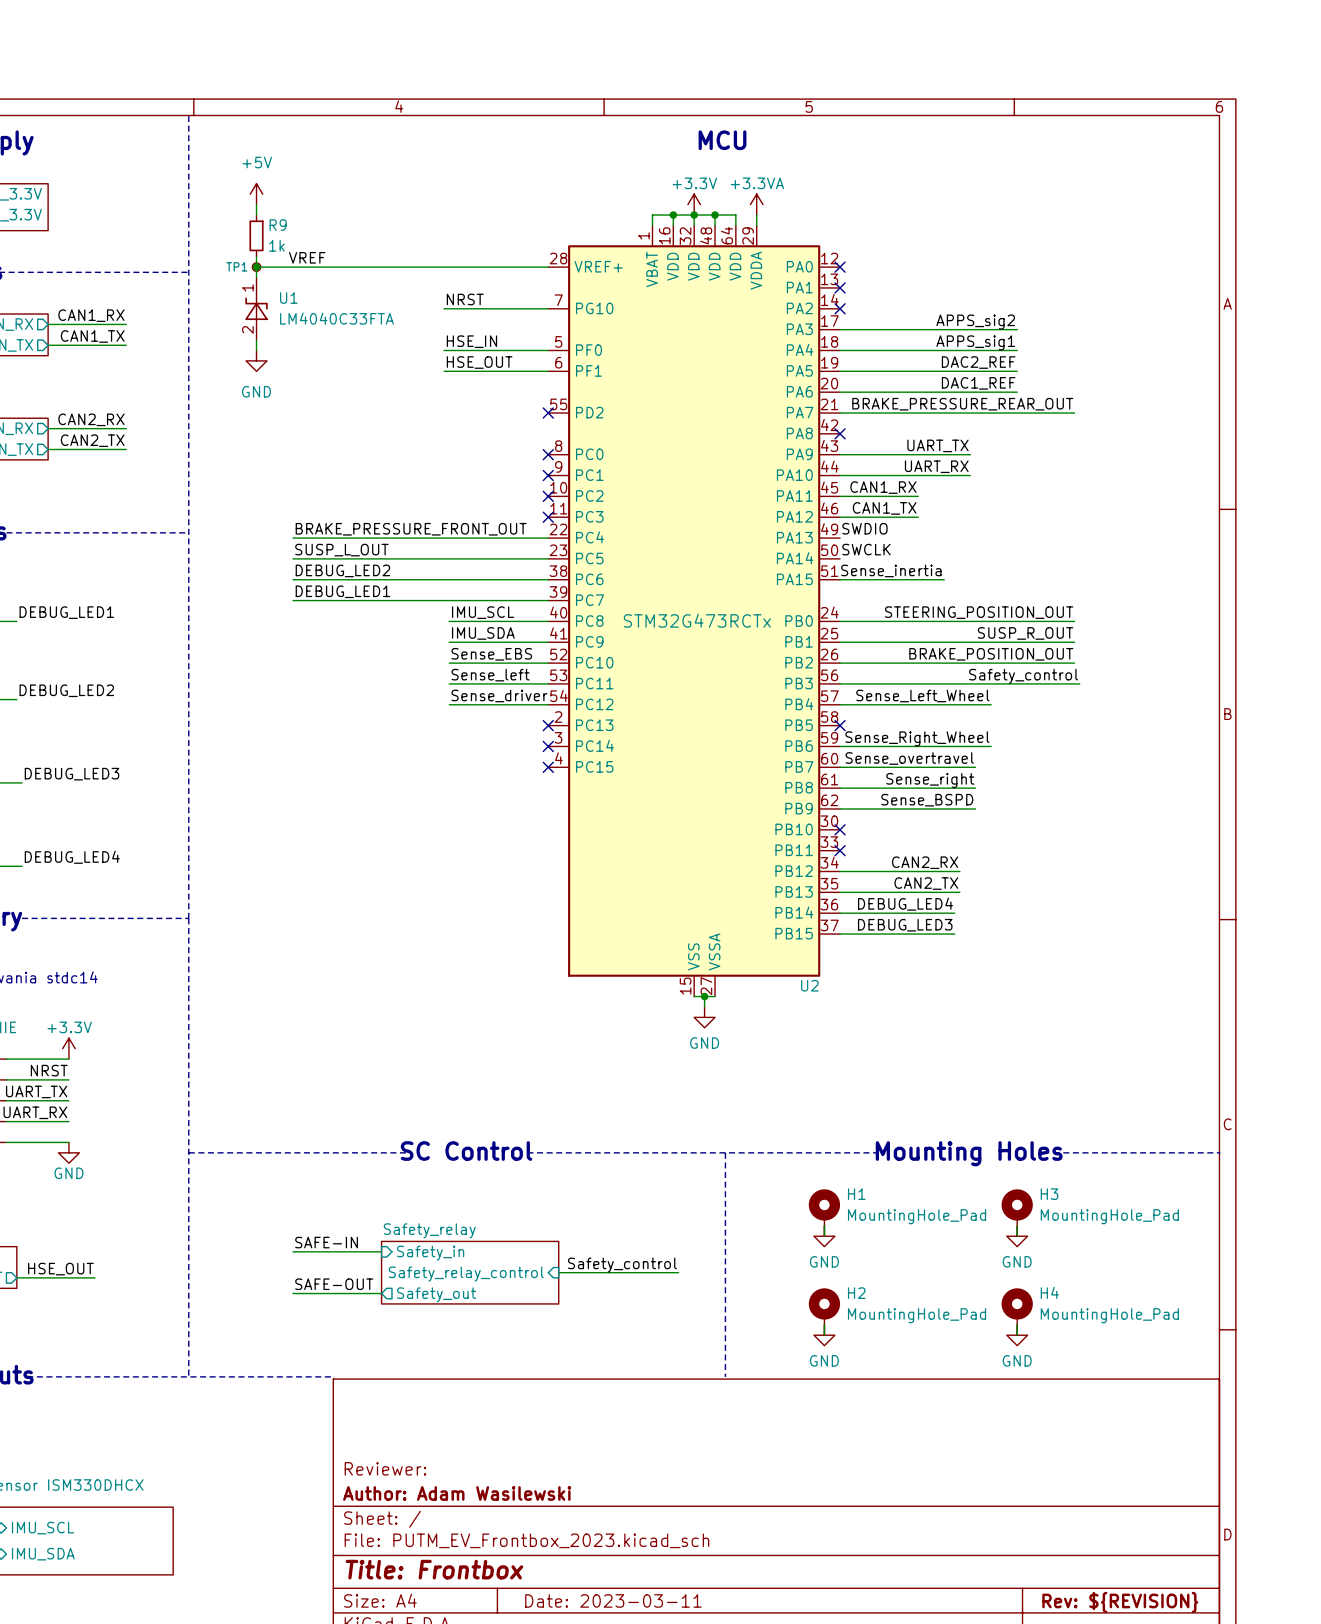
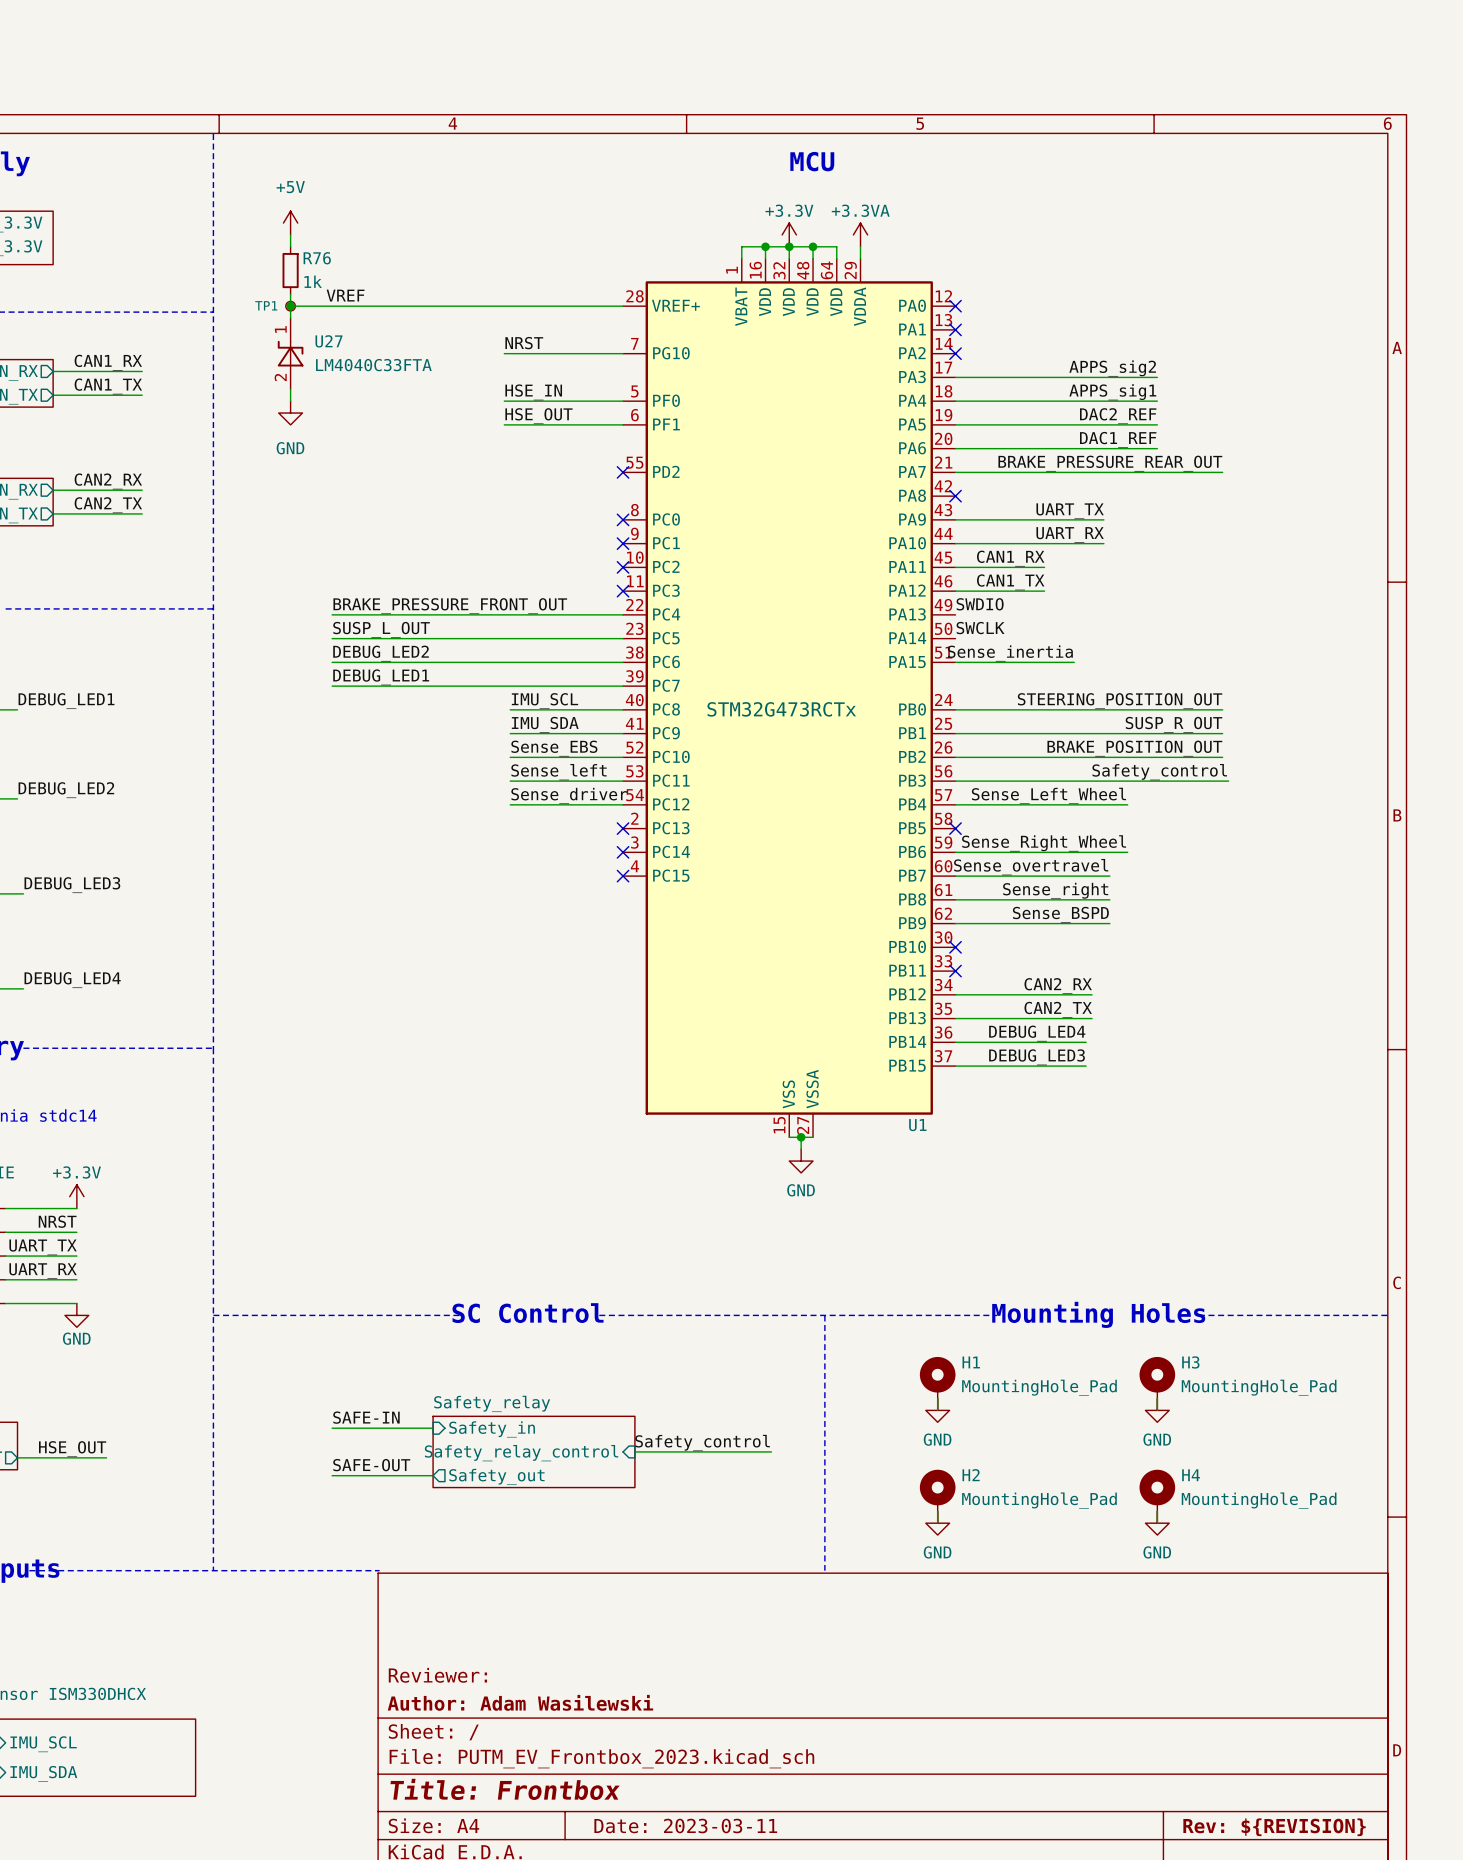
R9 name: R9 (278, 225) -> R76 (317, 258)
U1 name: U1 (288, 297) -> U27 (329, 341)
U2 name: U2 (809, 985) -> U1 (917, 1125)

